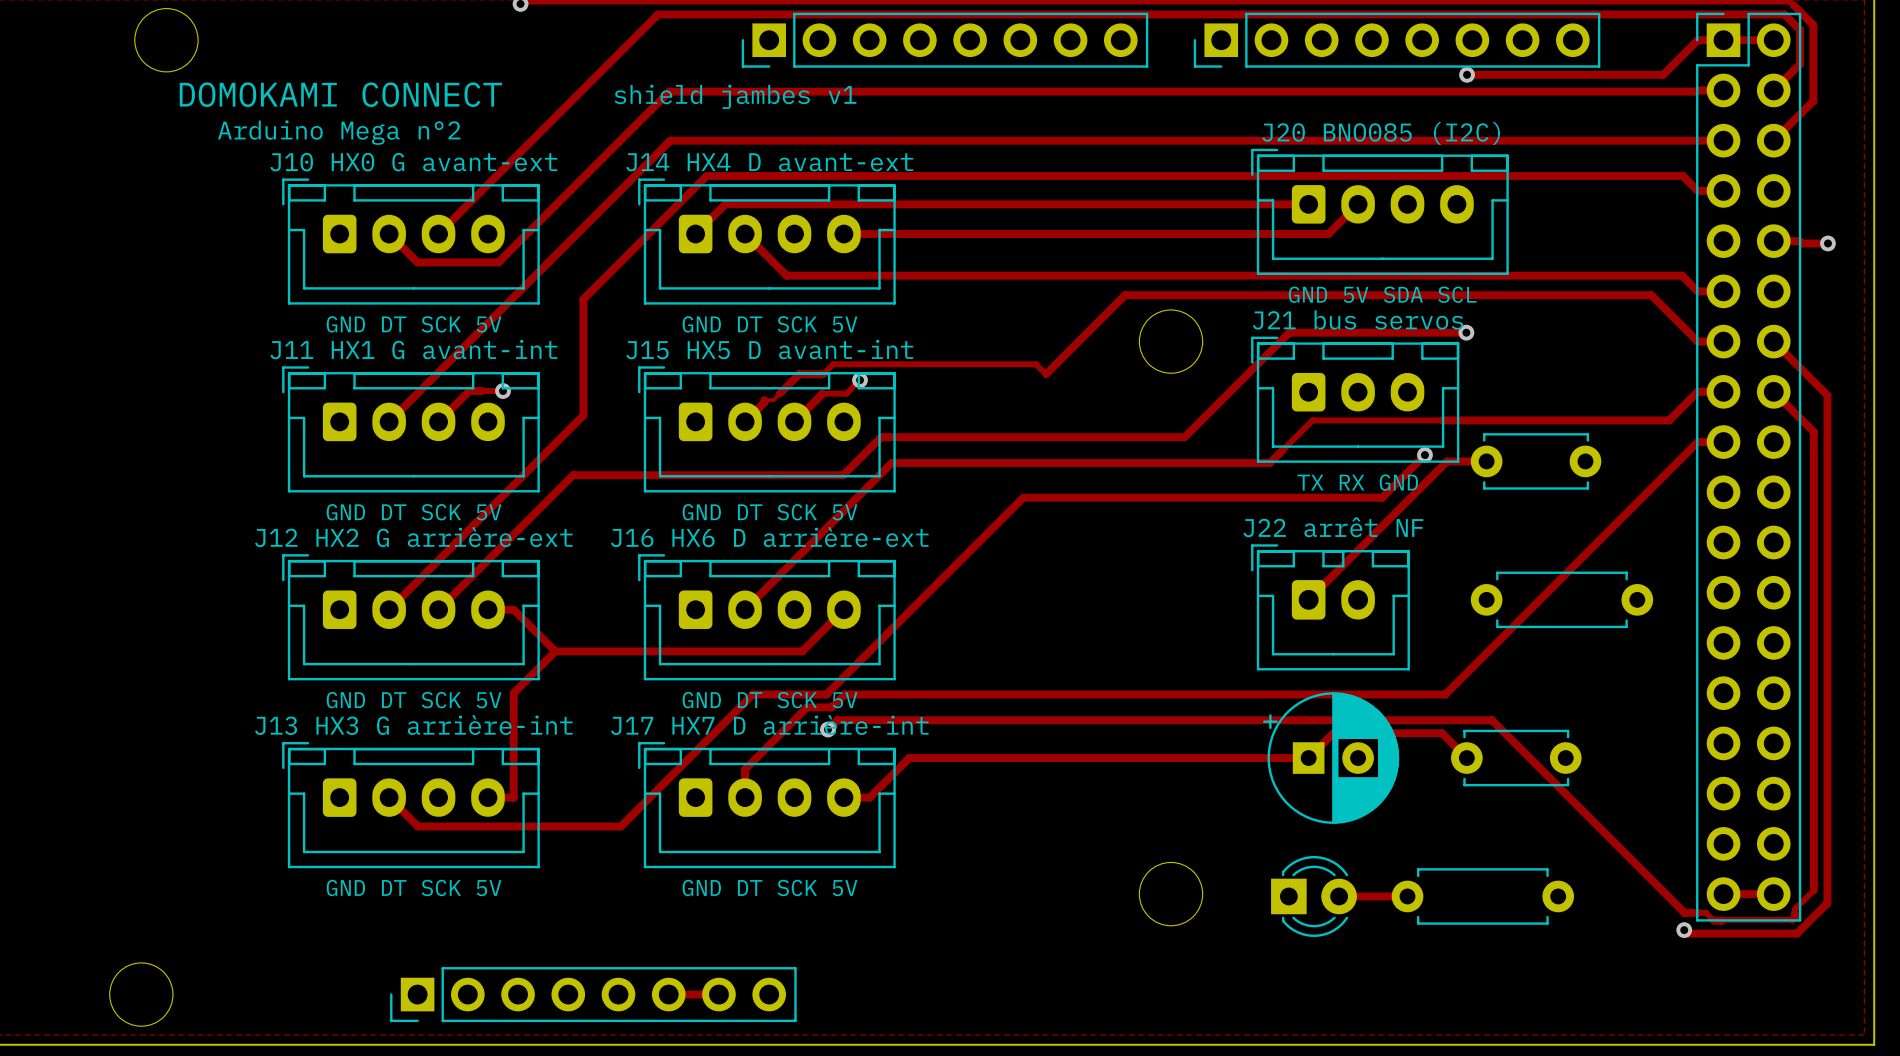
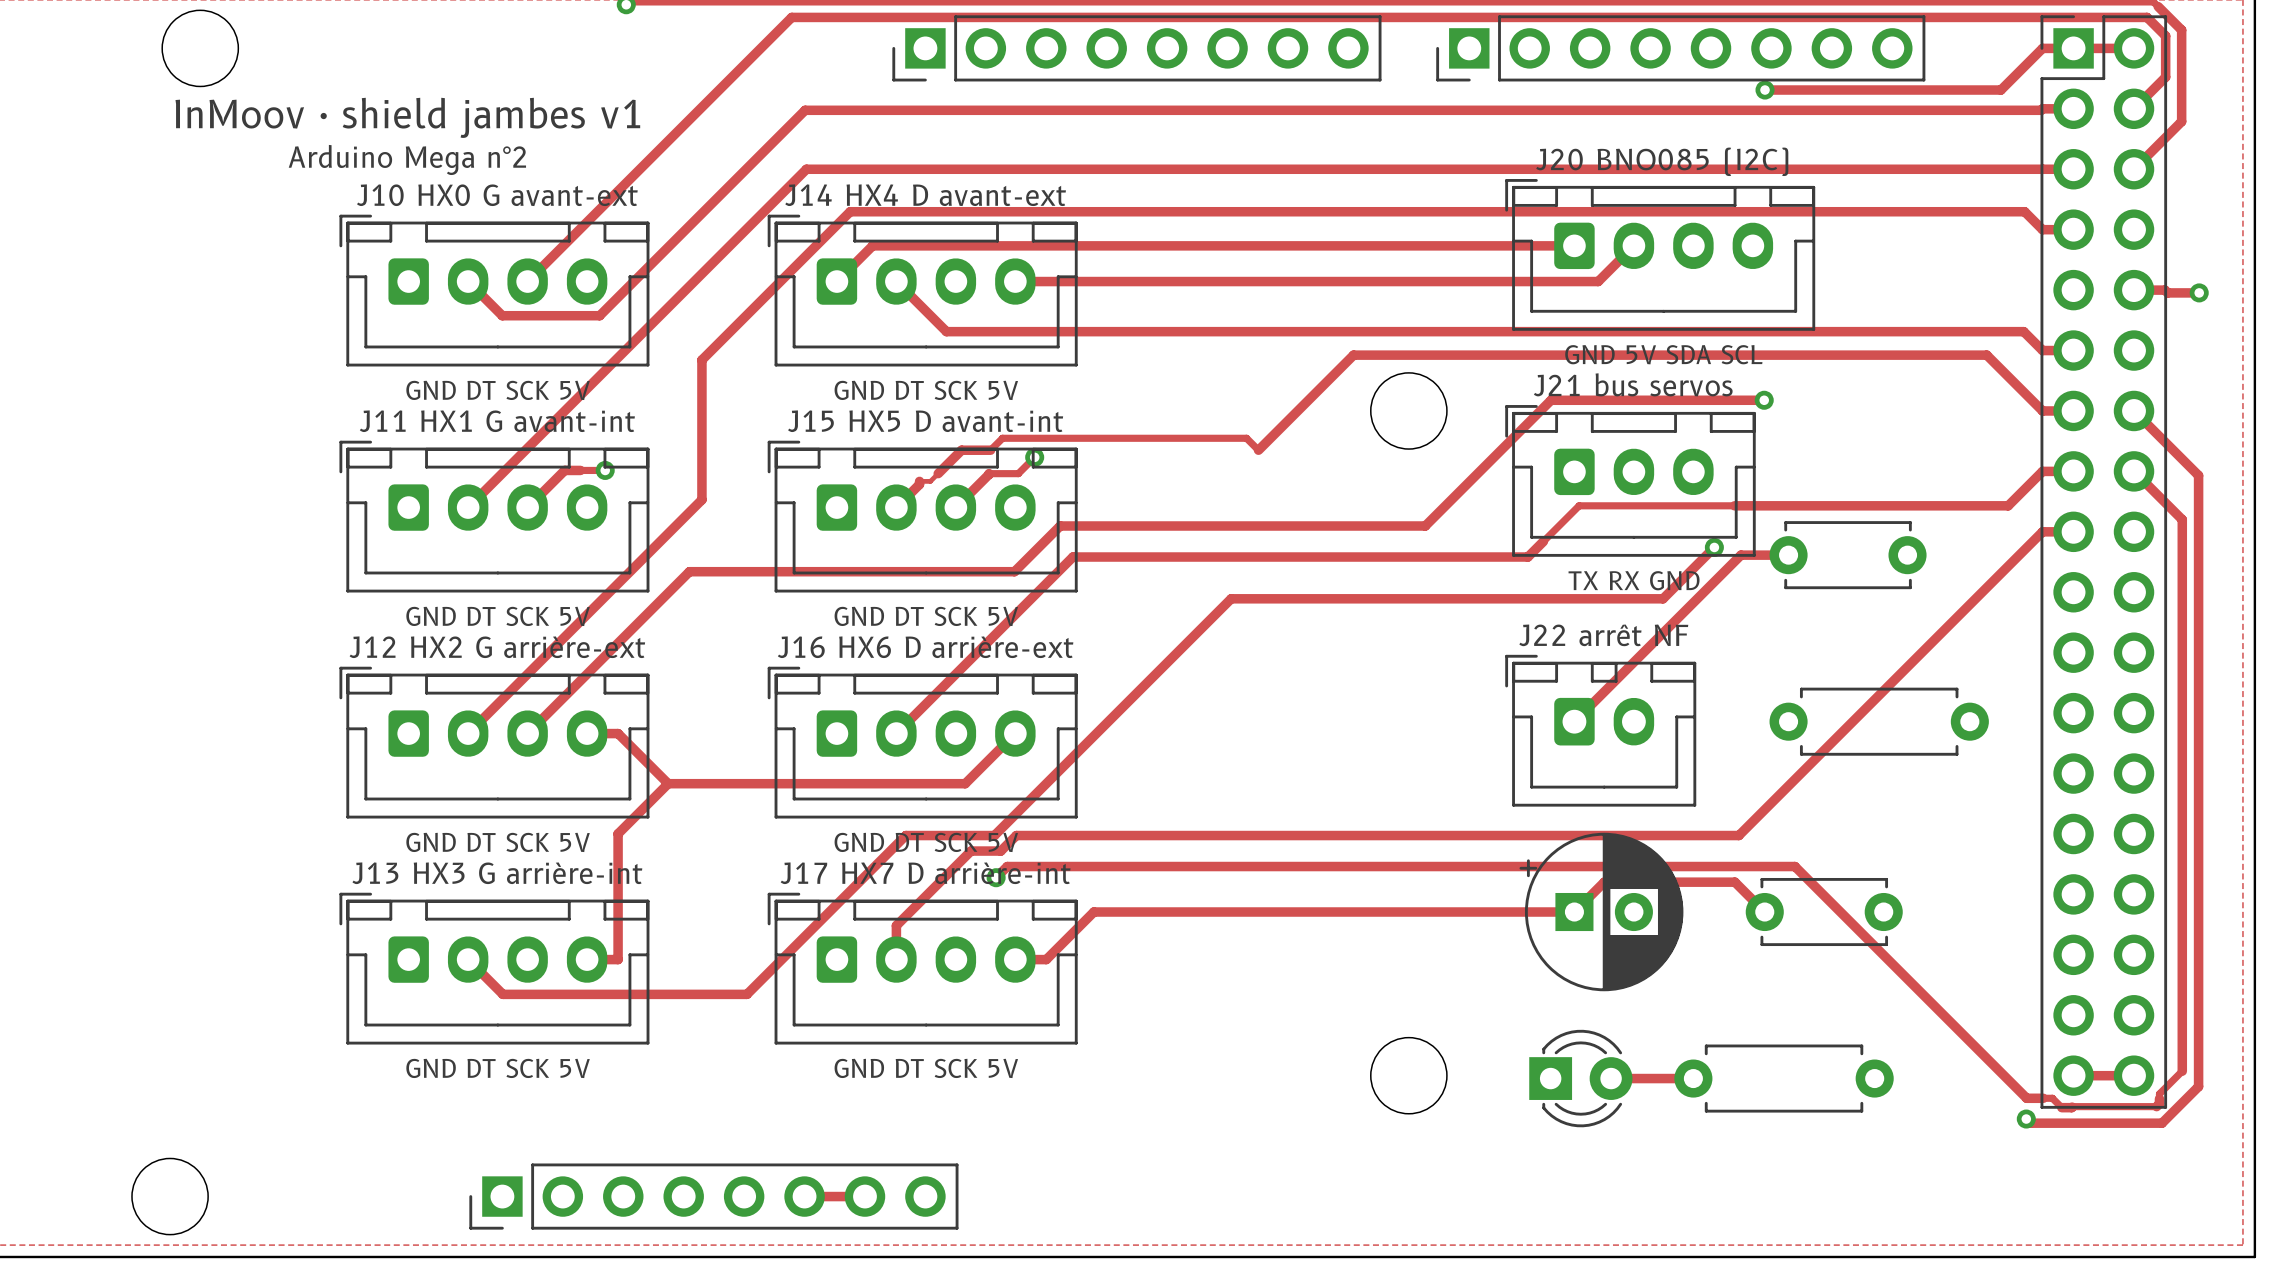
text: DOMOKAMI CONNECT (340, 94) -> InMoov · shield jambes v1 (407, 117)
text: shield jambes v1 (735, 96) -> none

